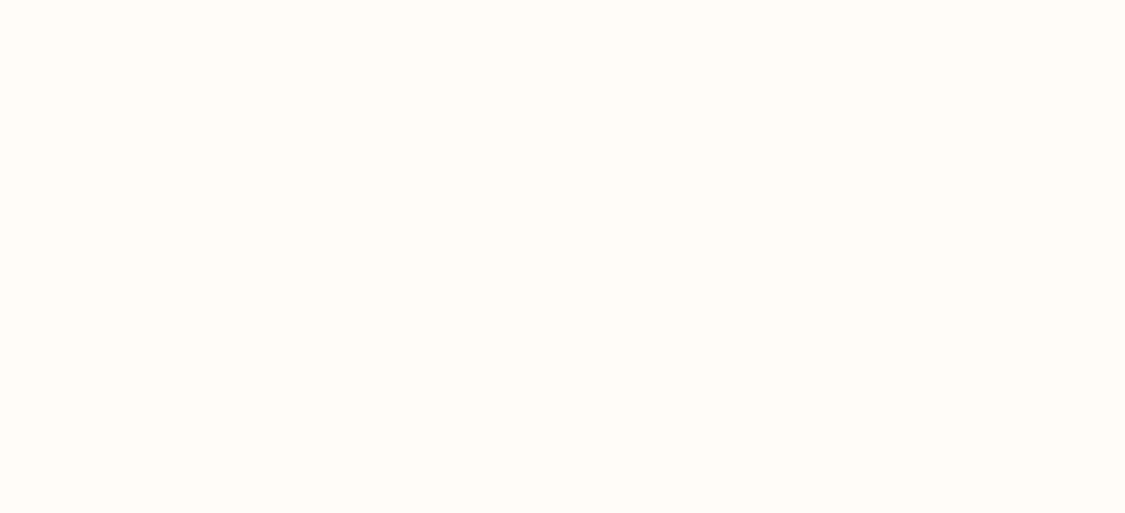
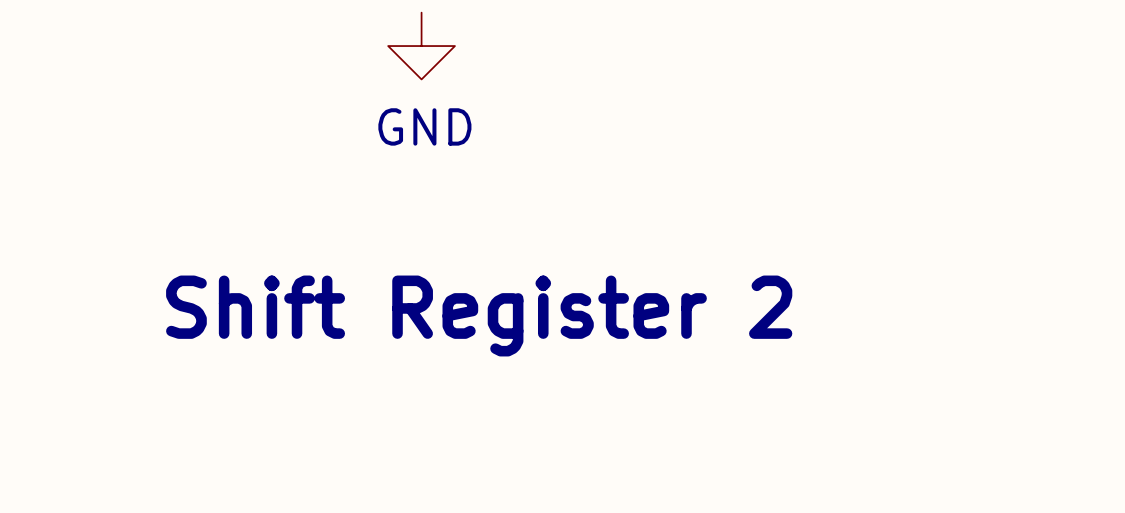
power symbol: none -> GND (421, 46)
text: none -> Shift Register 2 (479, 315)

